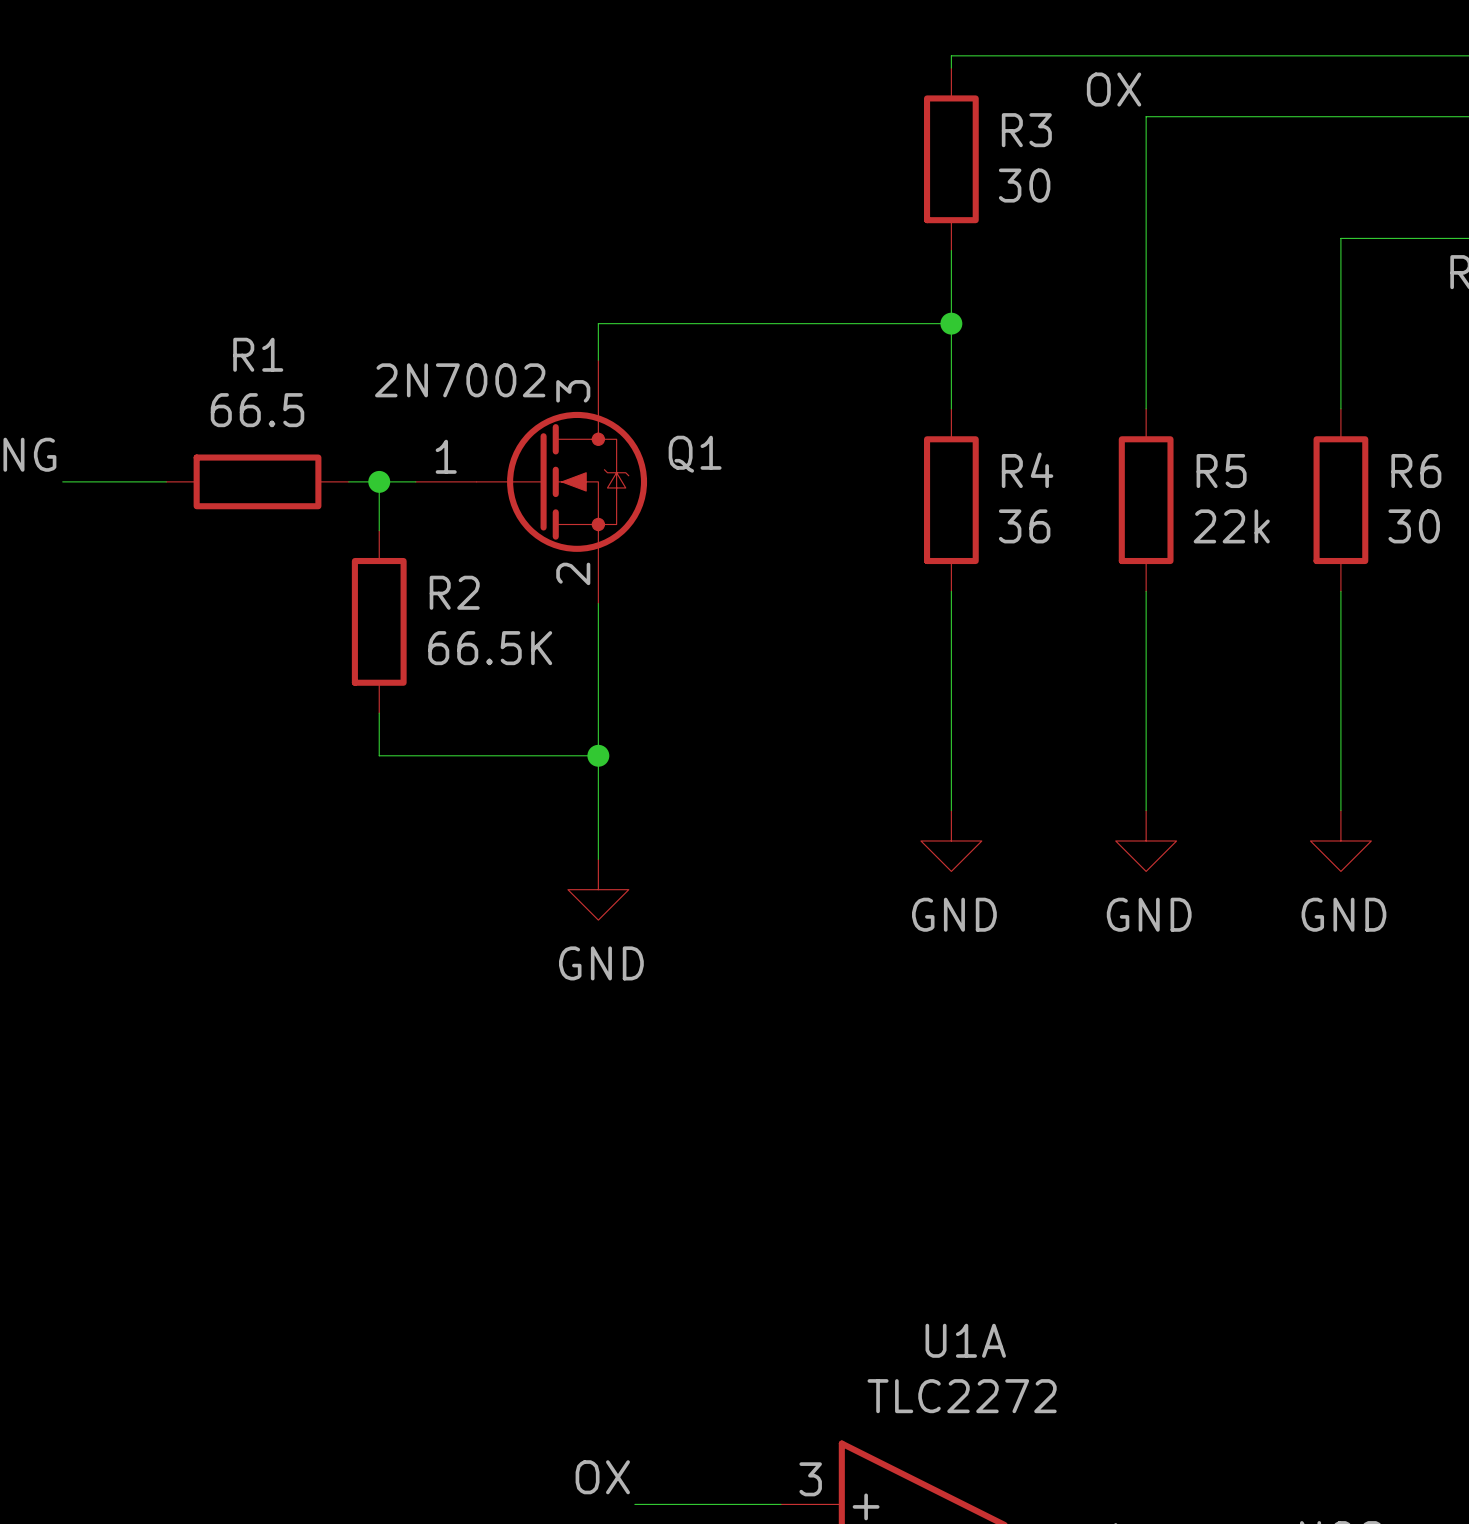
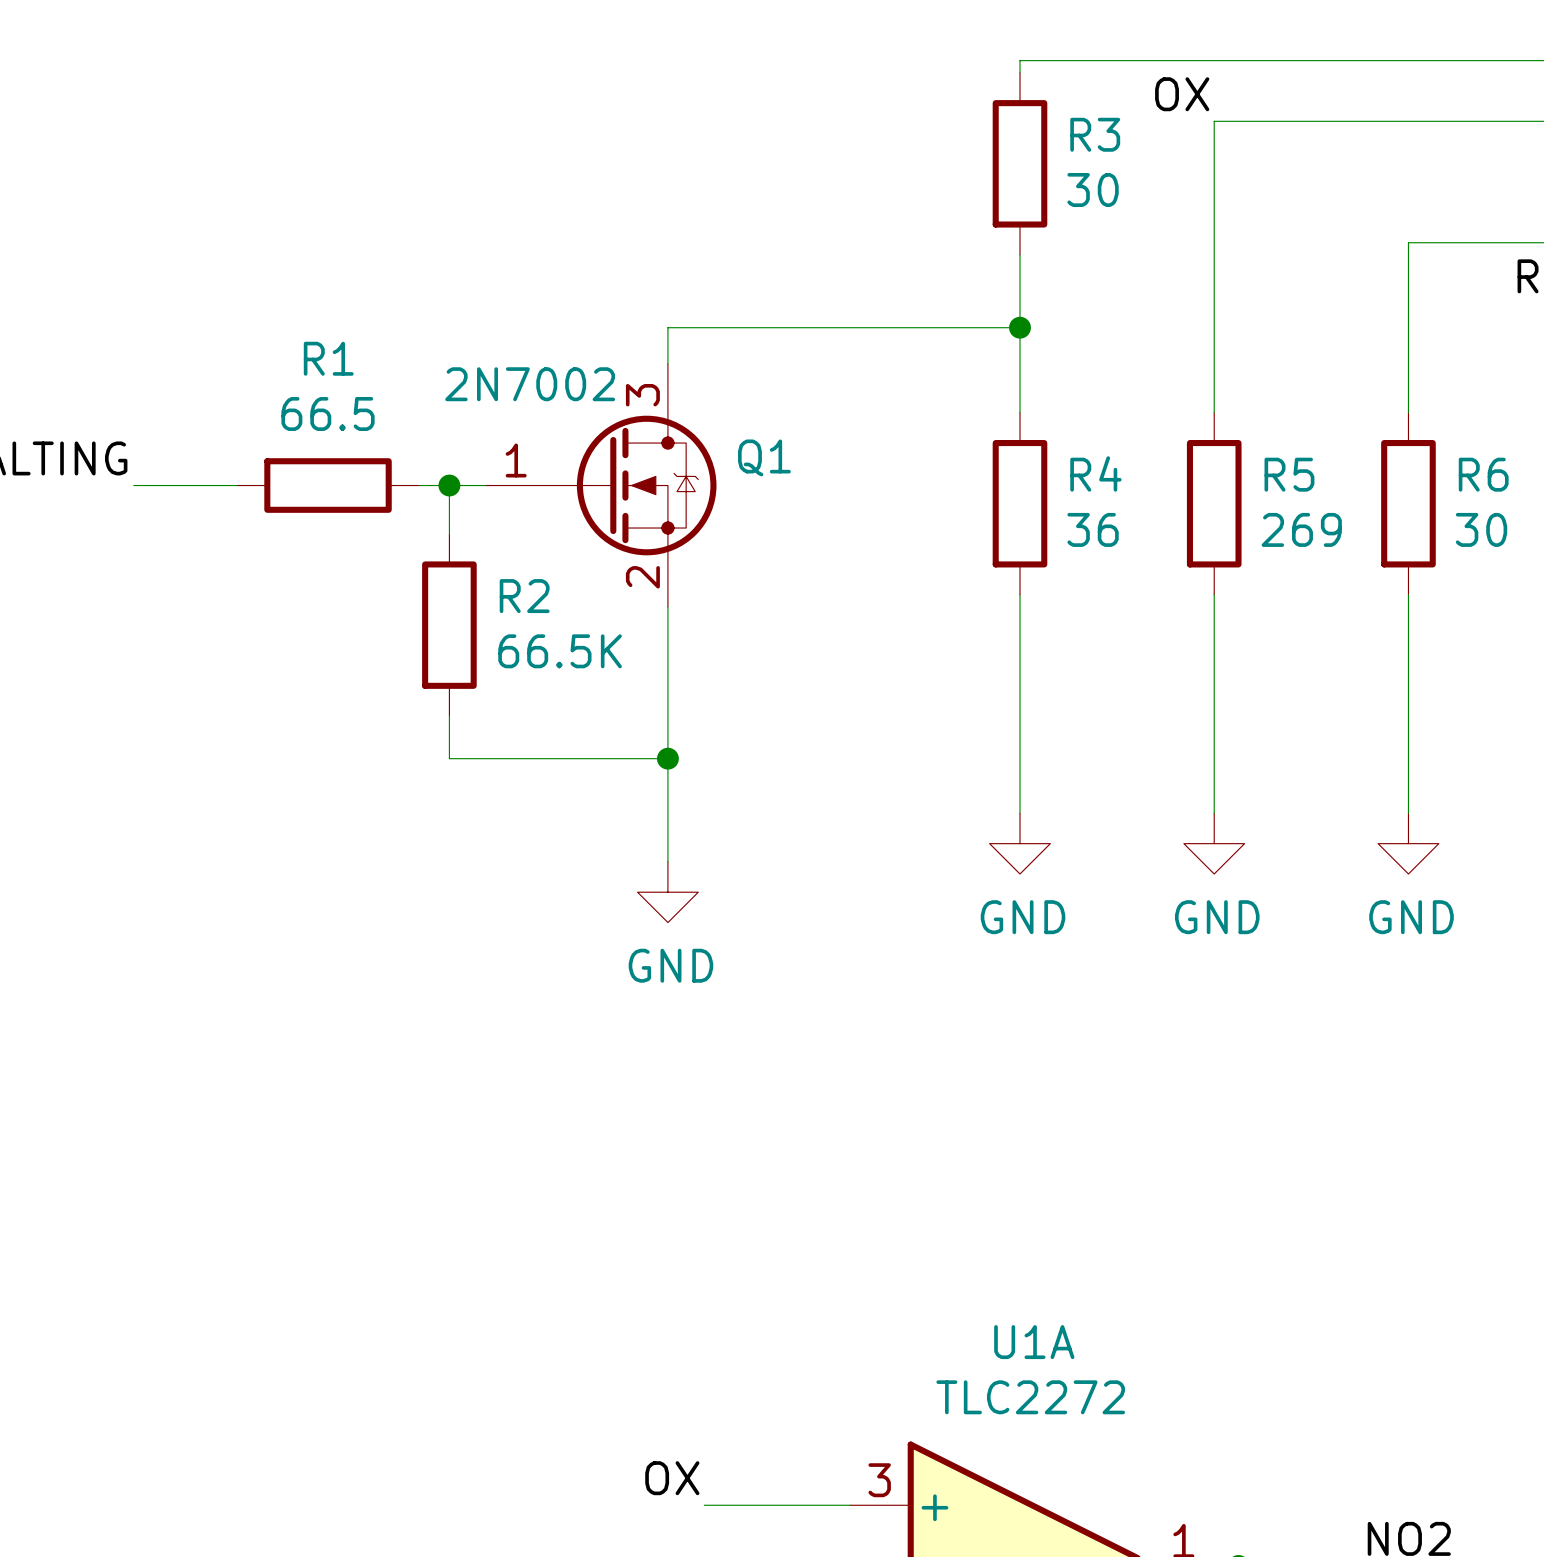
R5 value: 22k (1231, 526) -> 269 (1301, 529)

